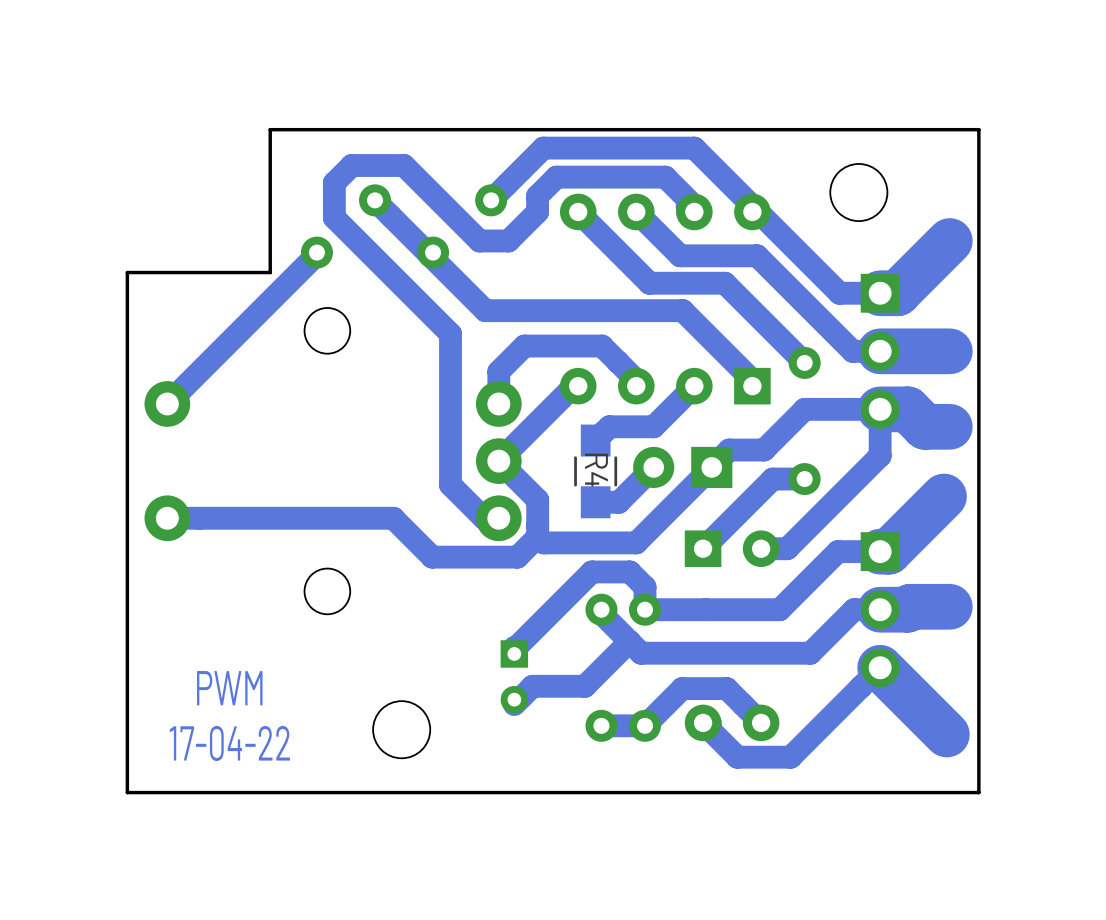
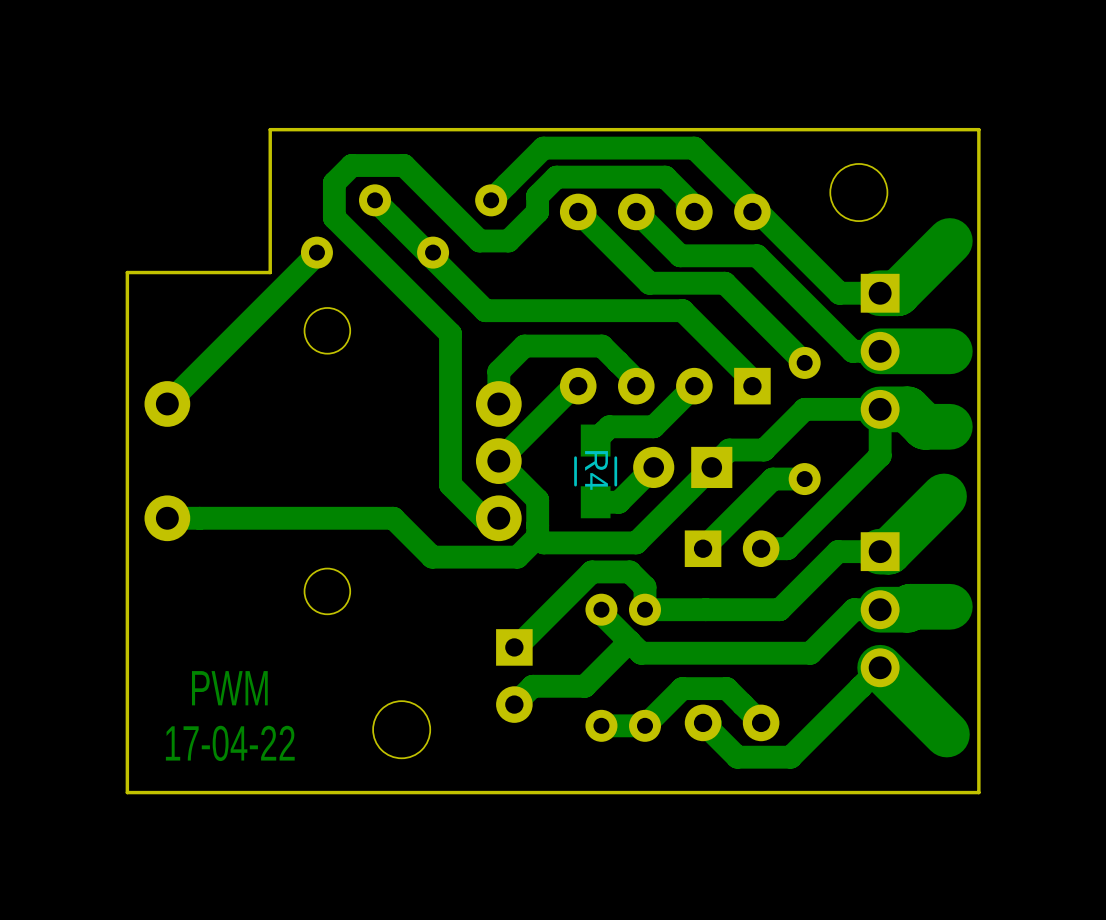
part footprint: [500, 640, 529, 714] -> [496, 629, 533, 723]

